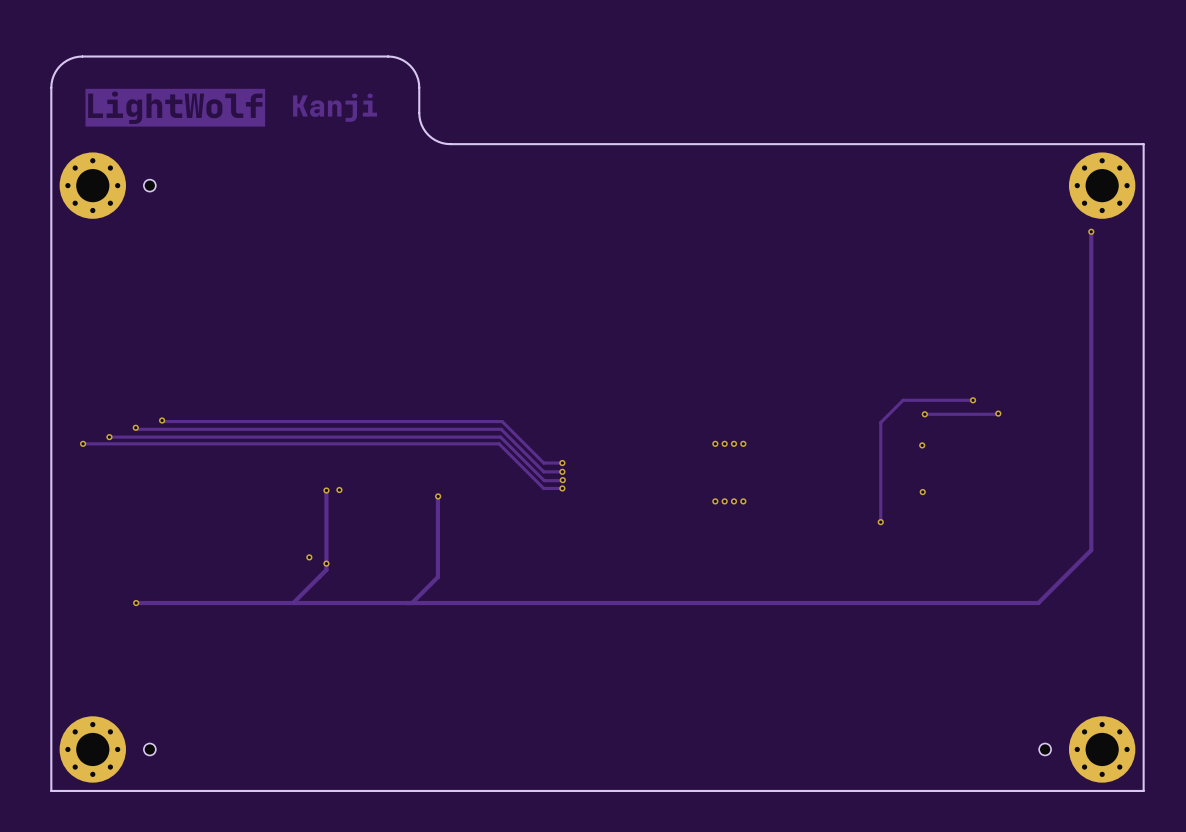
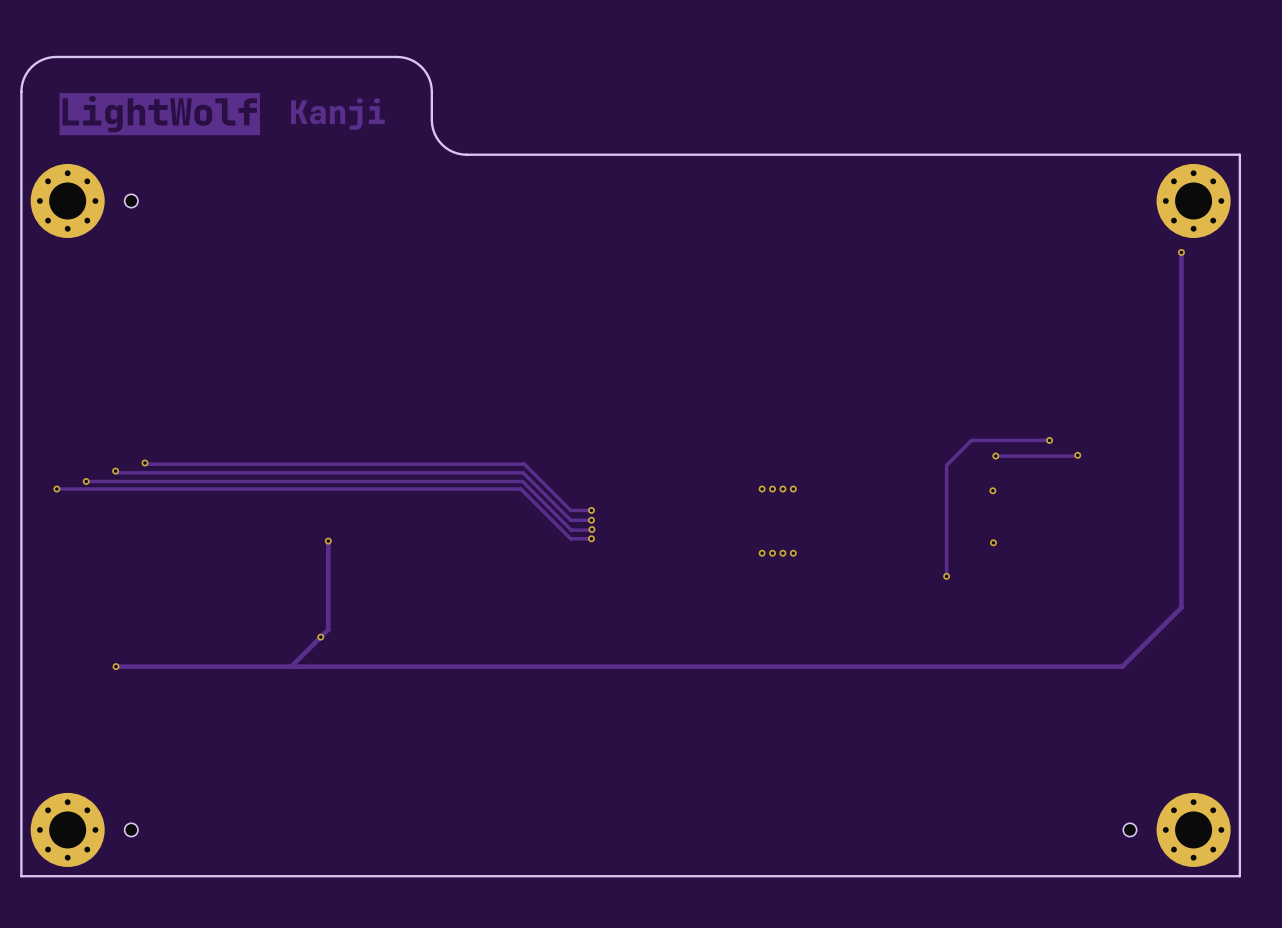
via: (339, 490) -> none
track: (438, 496) (437, 577) (412, 603) -> none
via: (438, 496) -> none
via: (309, 557) -> none
via: (326, 563) -> none
via: none -> (320, 637)

